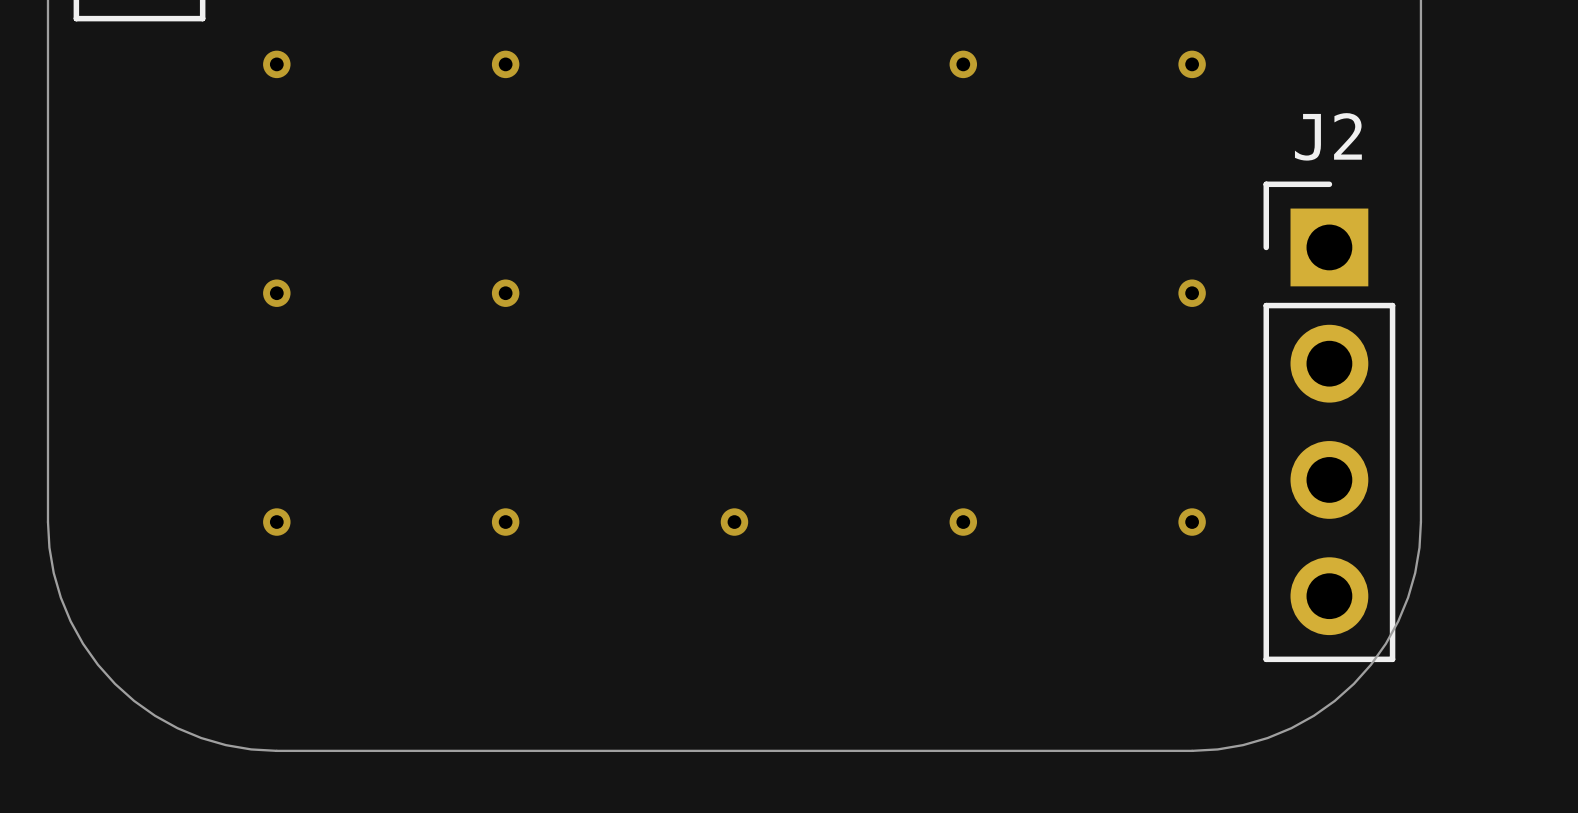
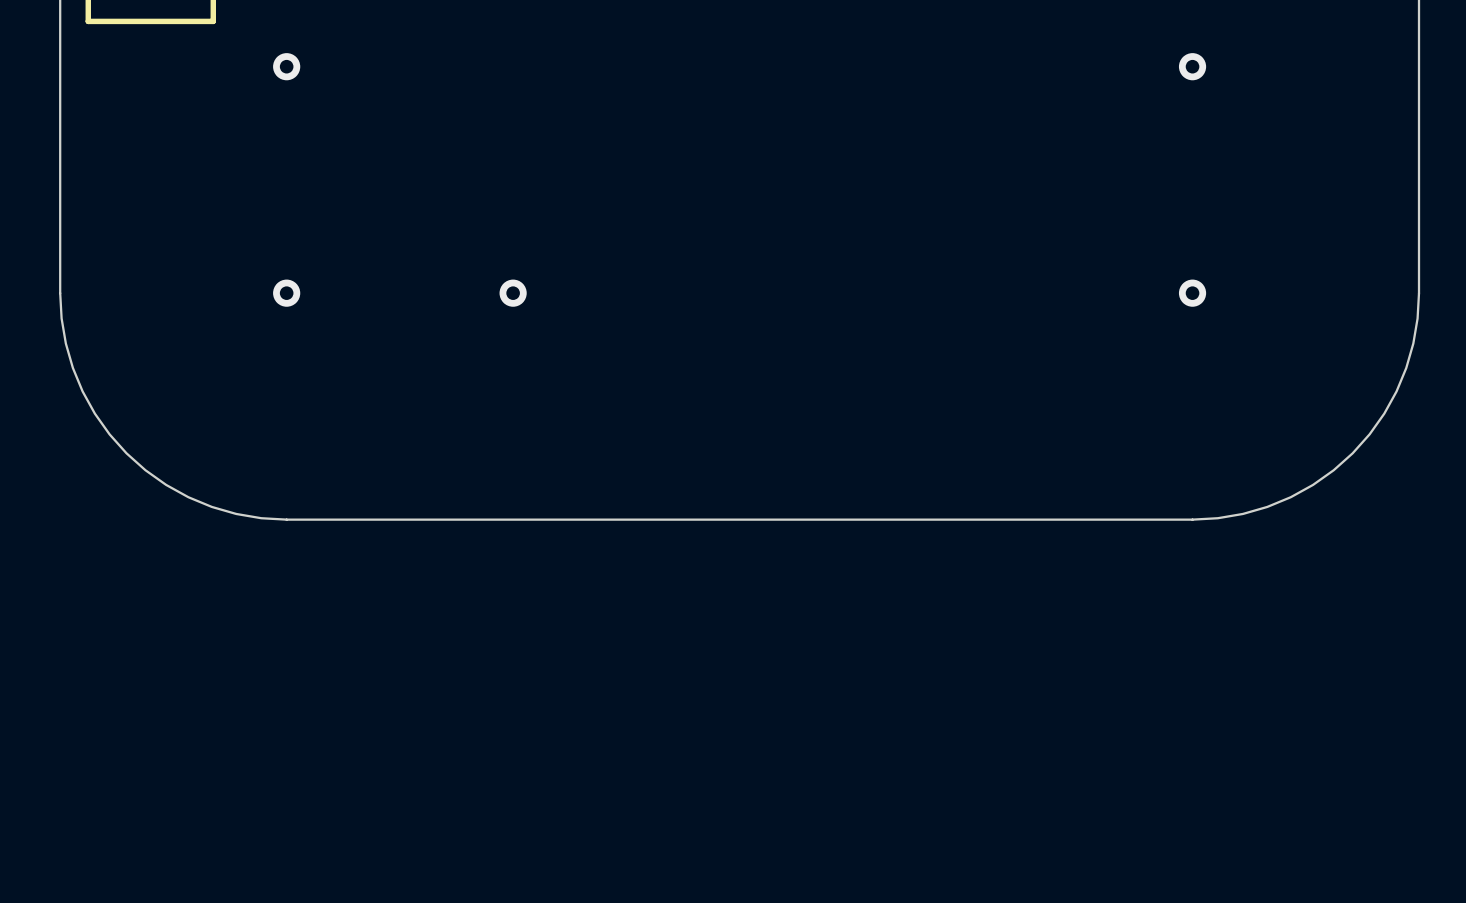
via: (505, 64) -> none
via: (963, 64) -> none
board edge: (1420, 293) (1419, 547) (1408, 597) (1398, 621) (1385, 643) (1353, 683) (1313, 715) (1291, 728) (1243, 745) (1192, 750) (276, 750) (225, 745) (201, 738) (155, 715) (115, 683) (83, 643) (60, 597) (49, 547) (47, 522) (47, 293) -> (1419, 293) (1413, 343) (1396, 391) (1384, 413) (1352, 453) (1313, 484) (1267, 506) (1242, 513) (1192, 519) (286, 519) (236, 513) (211, 506) (166, 484) (145, 470) (109, 434) (94, 413) (72, 367) (61, 318) (60, 293)
J2: (1329, 421) -> none
via: (276, 522) -> none
via: (505, 522) -> none
via: (734, 522) -> none
via: (963, 522) -> none
via: (1192, 522) -> none

